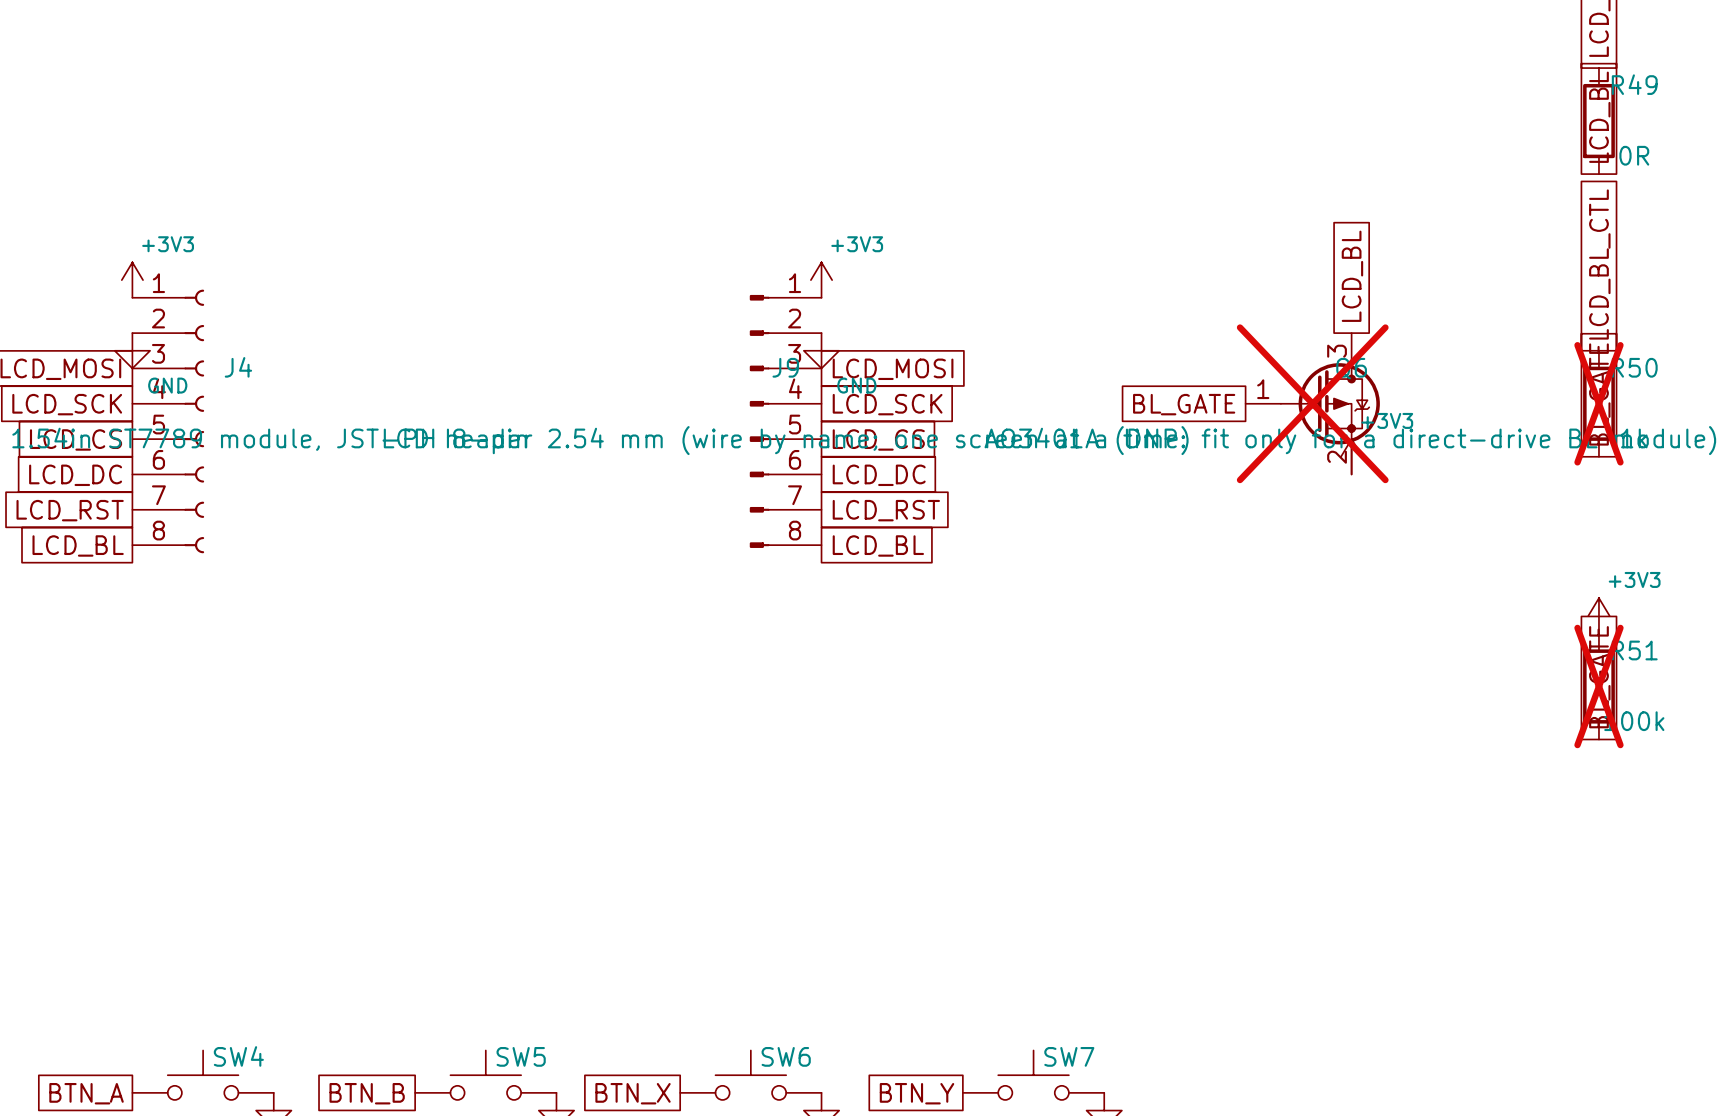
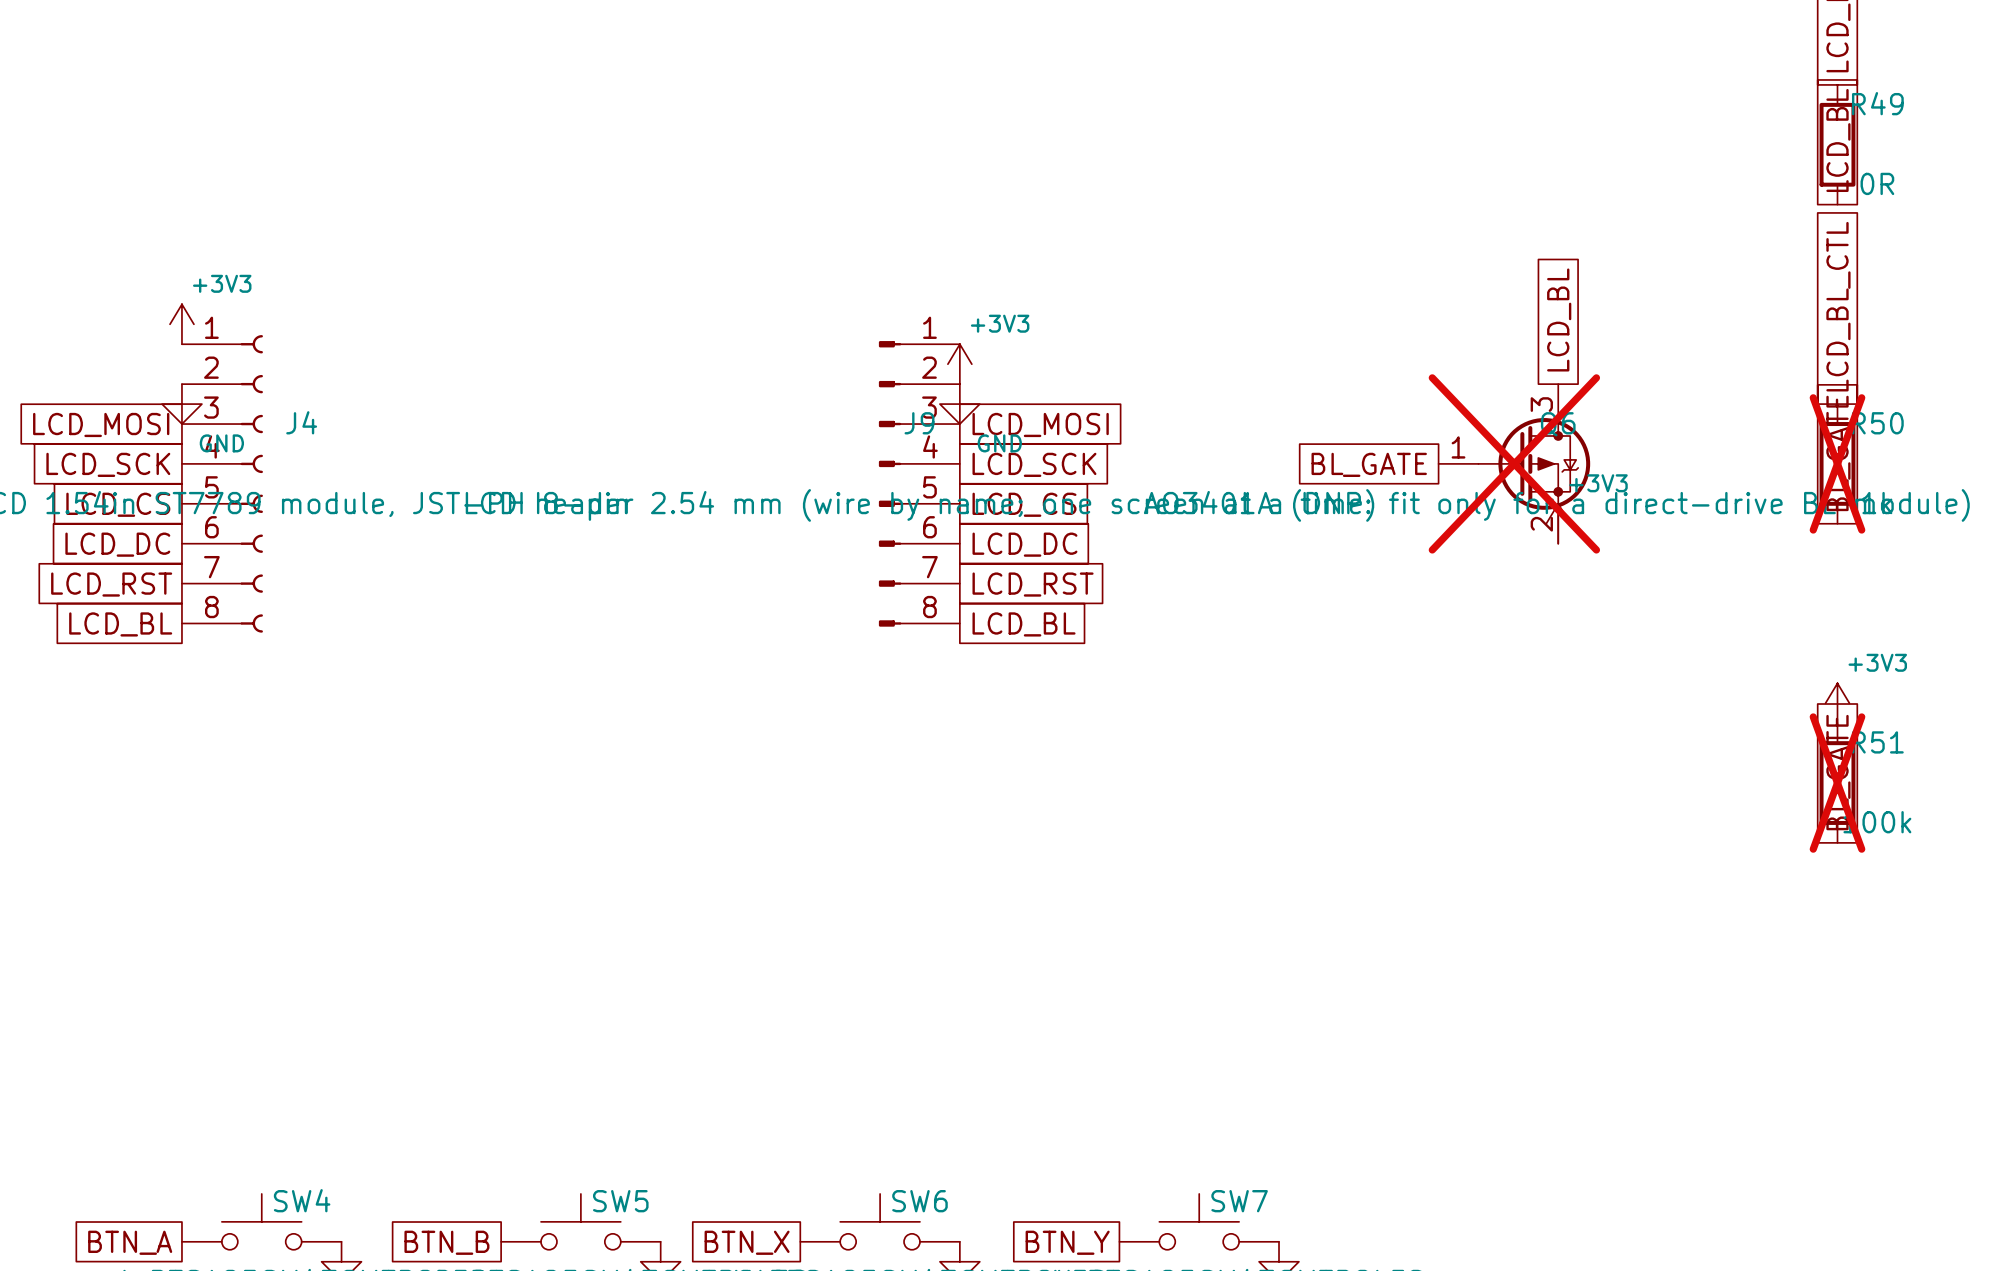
power symbol position: +3V3 (821, 280) -> +3V3 (959, 364)

